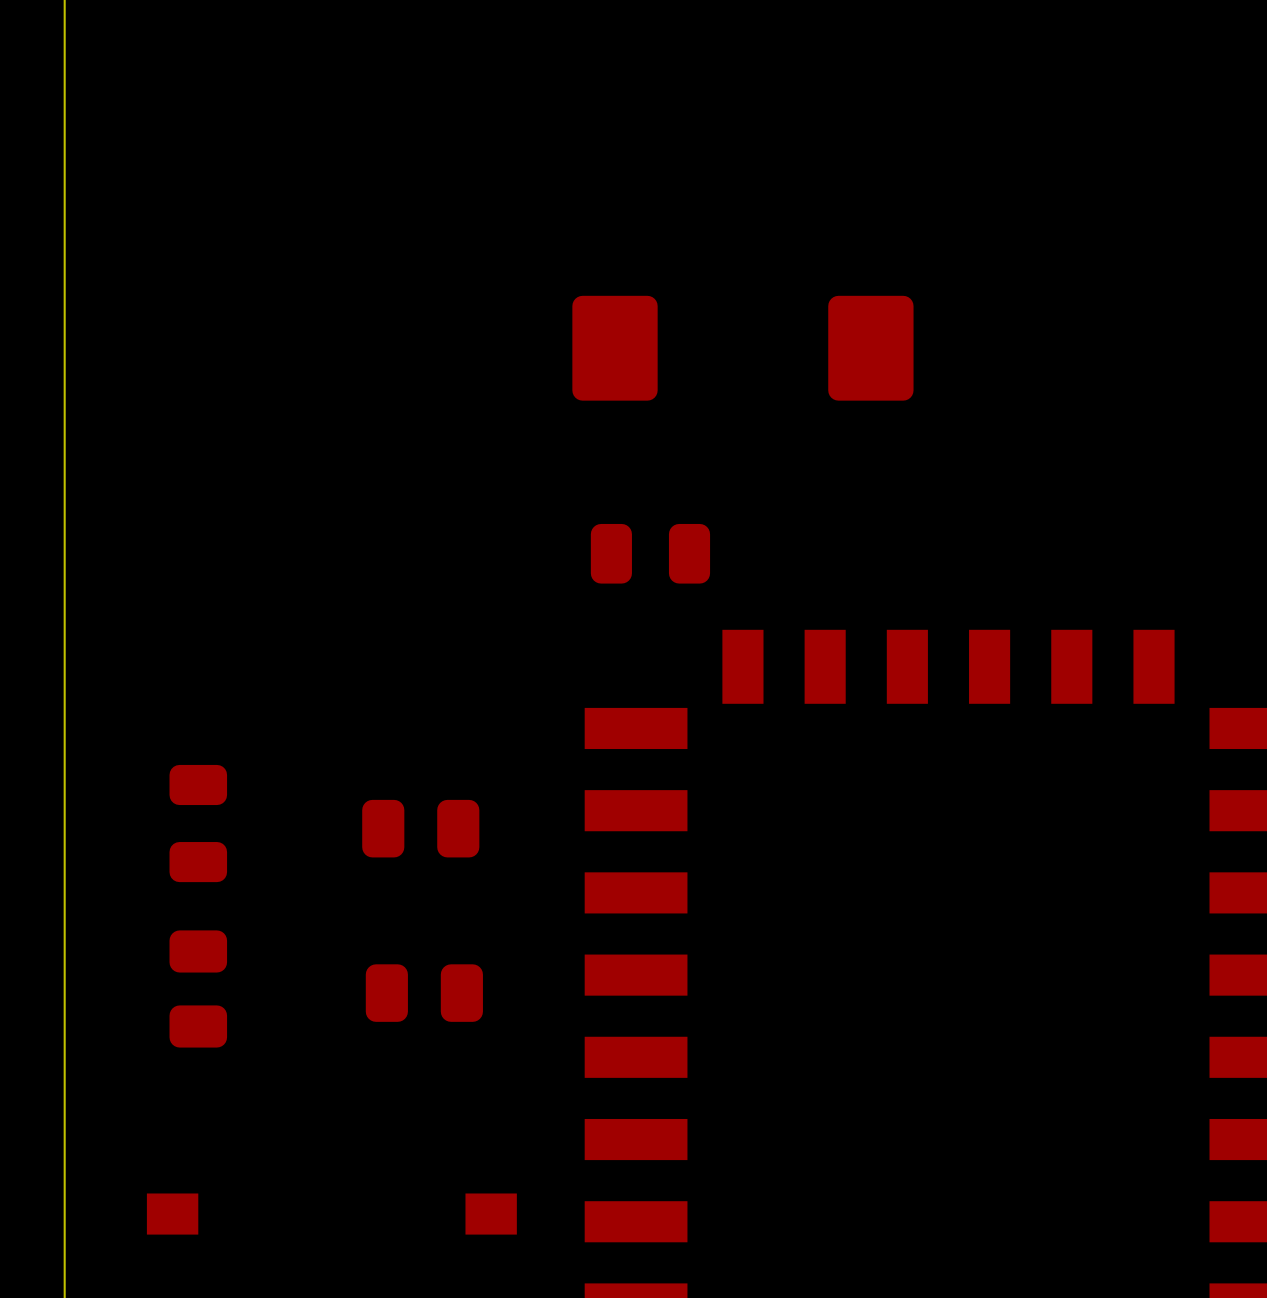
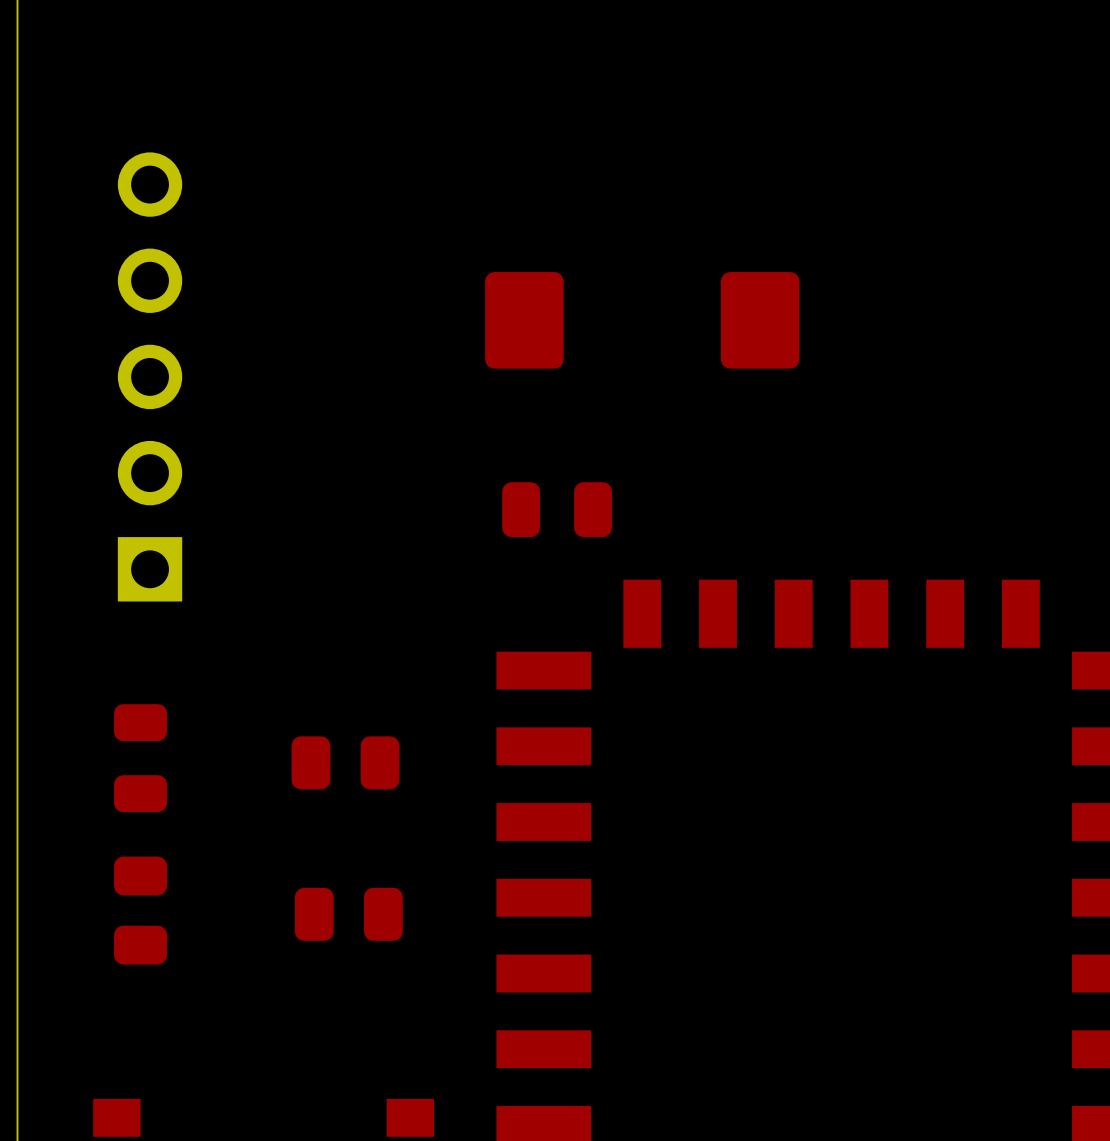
part: none -> (150, 376)

